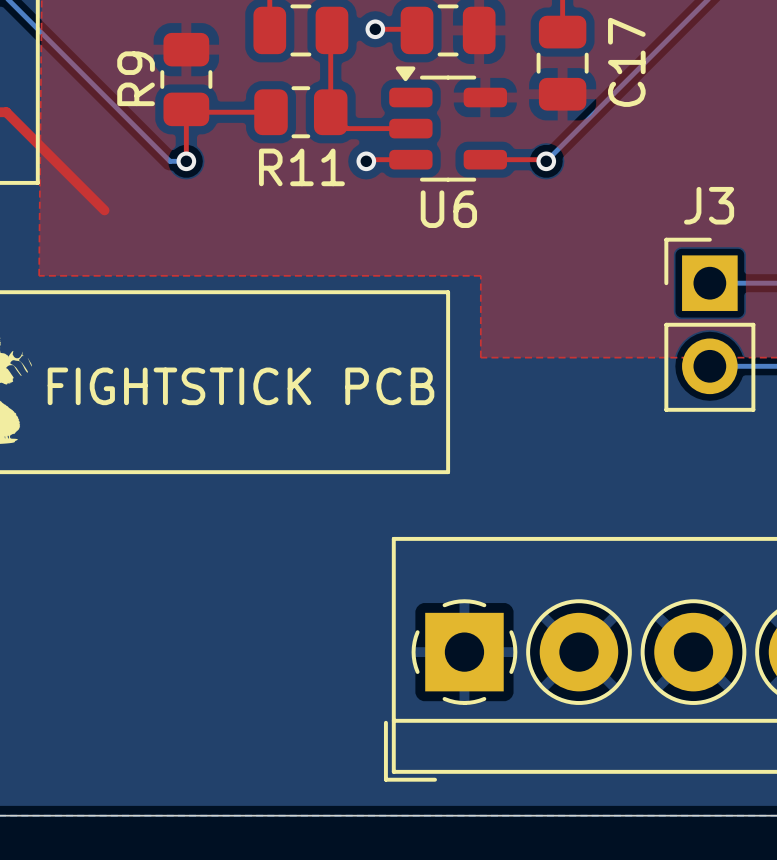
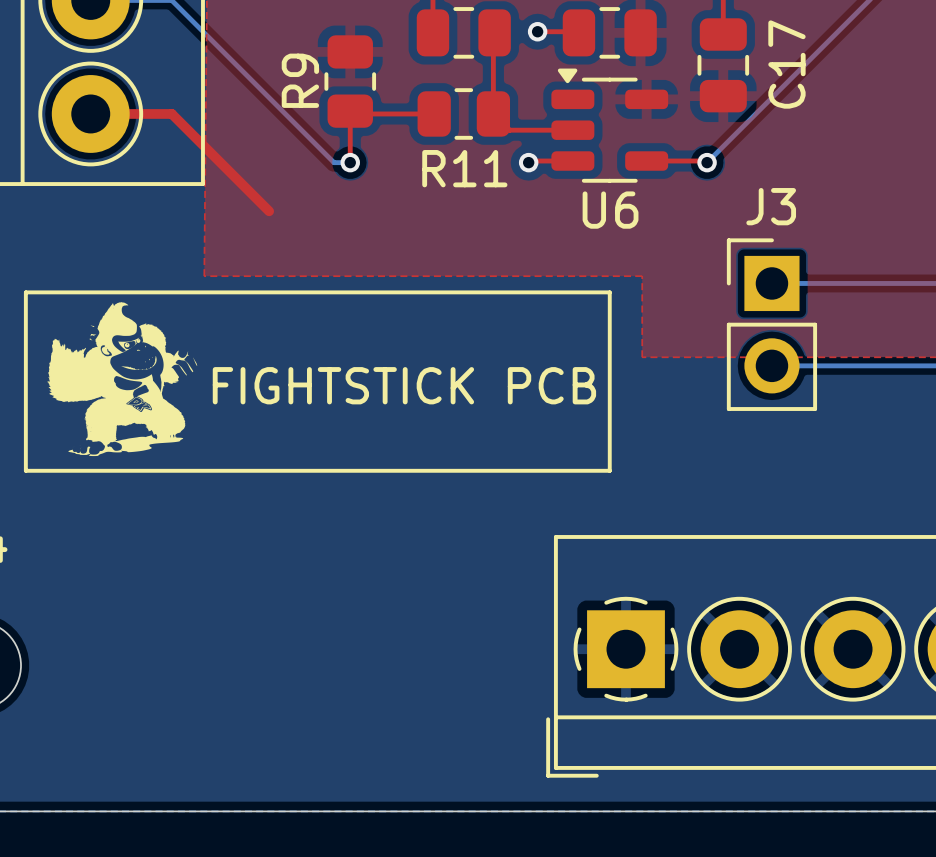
bottom track: none -> (771, 283) (869, 283)
J3 position: (709, 324) -> (771, 324)
bottom track: none -> (771, 365) (869, 365)

